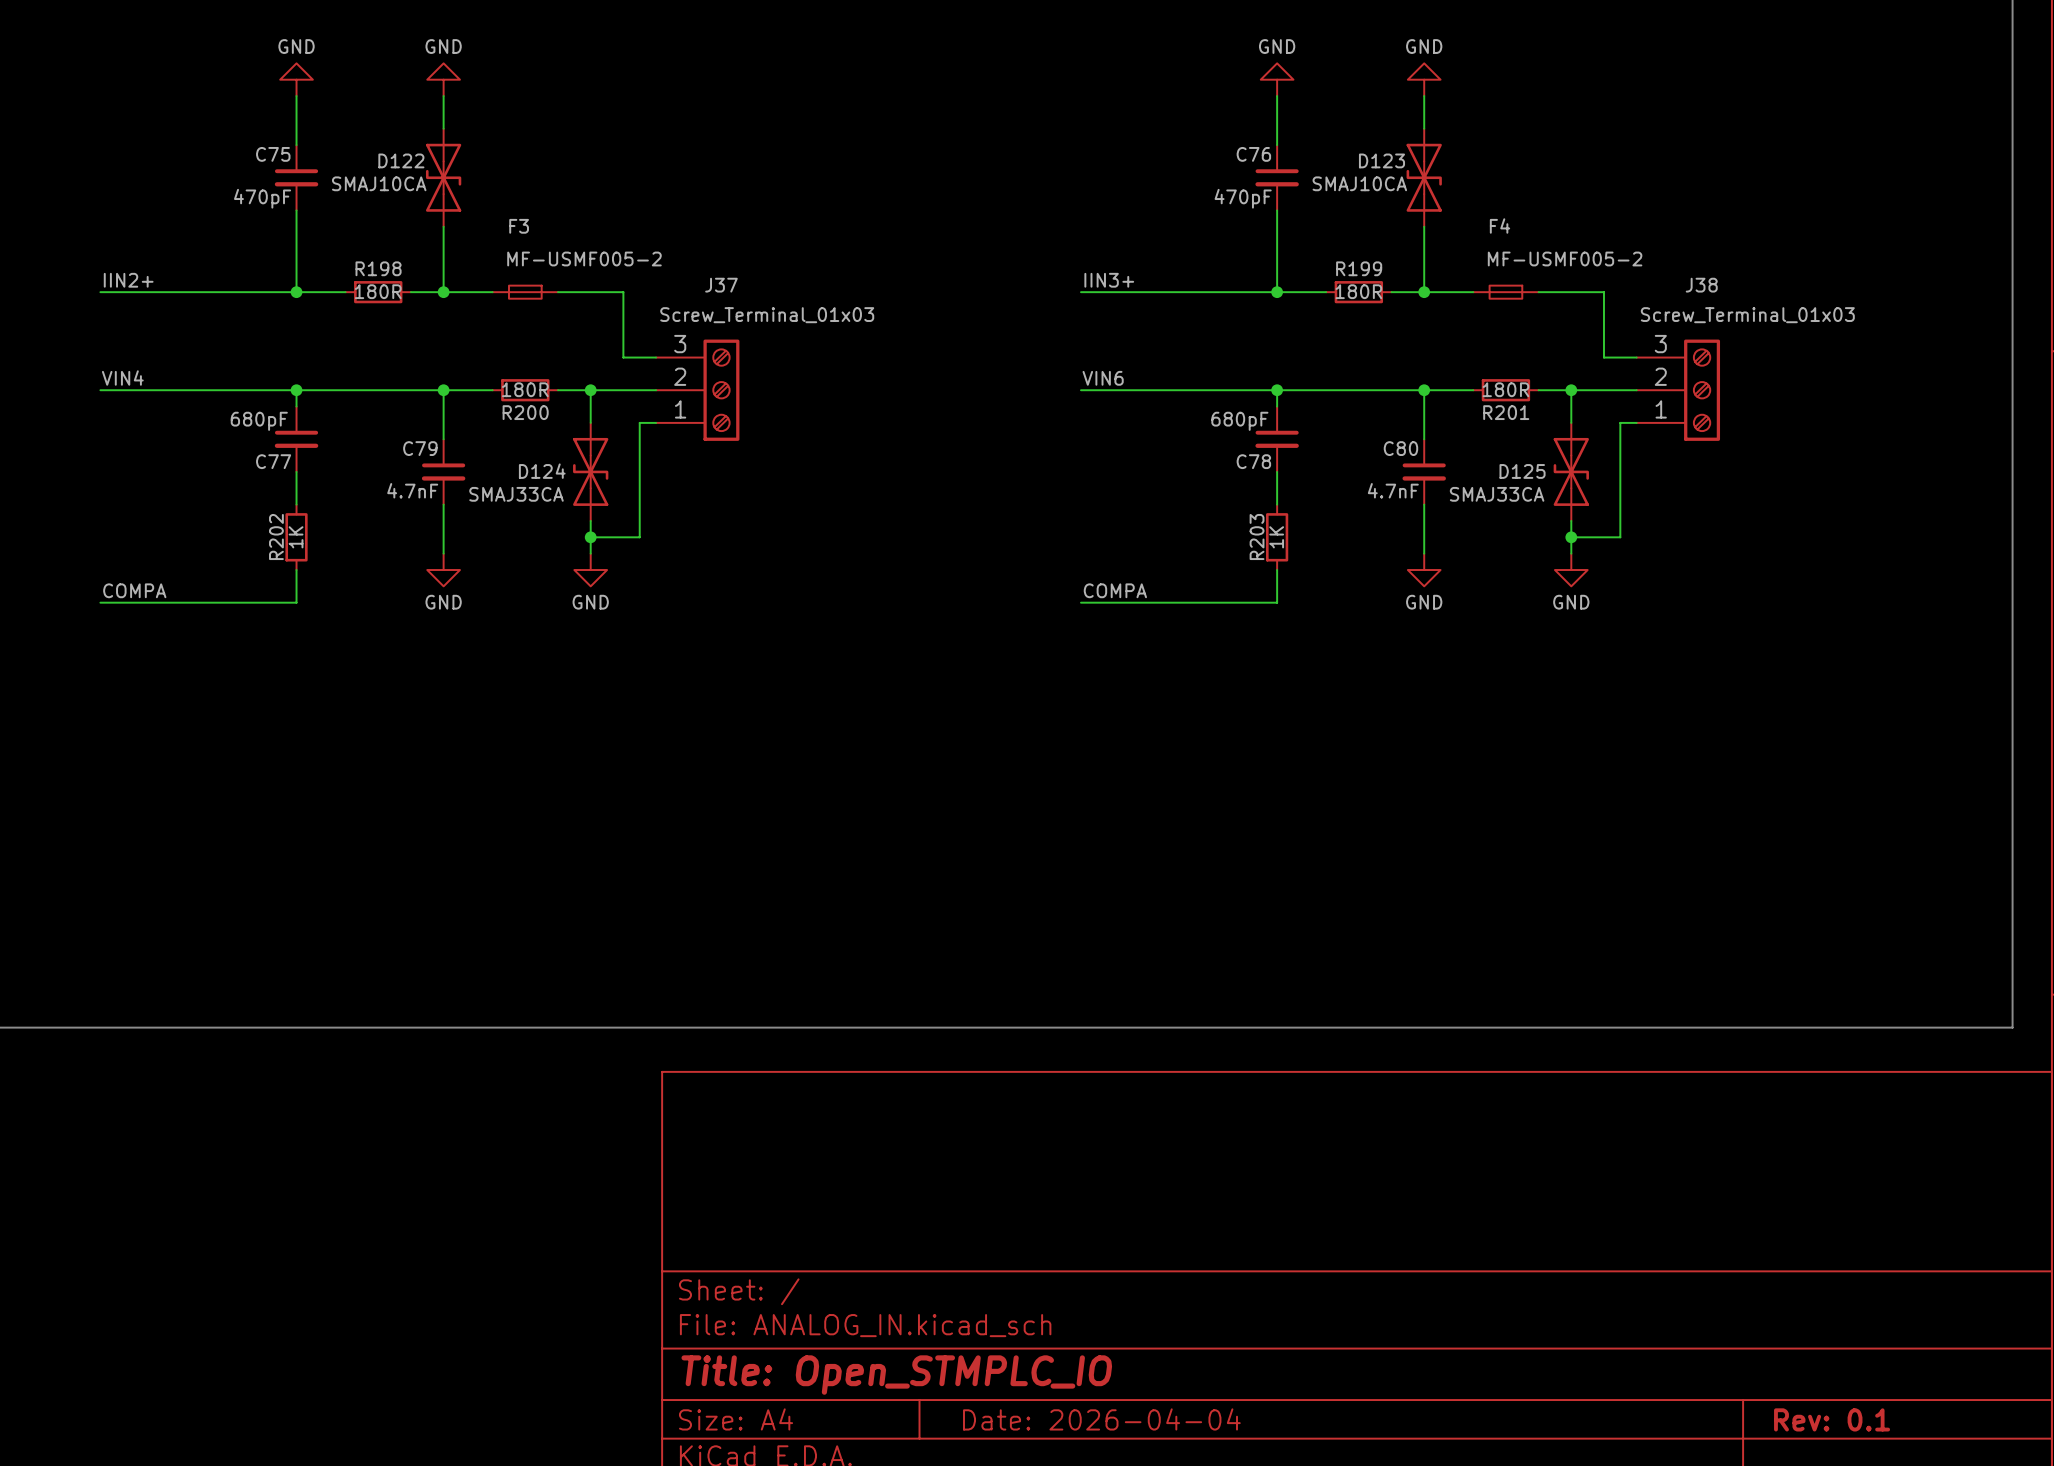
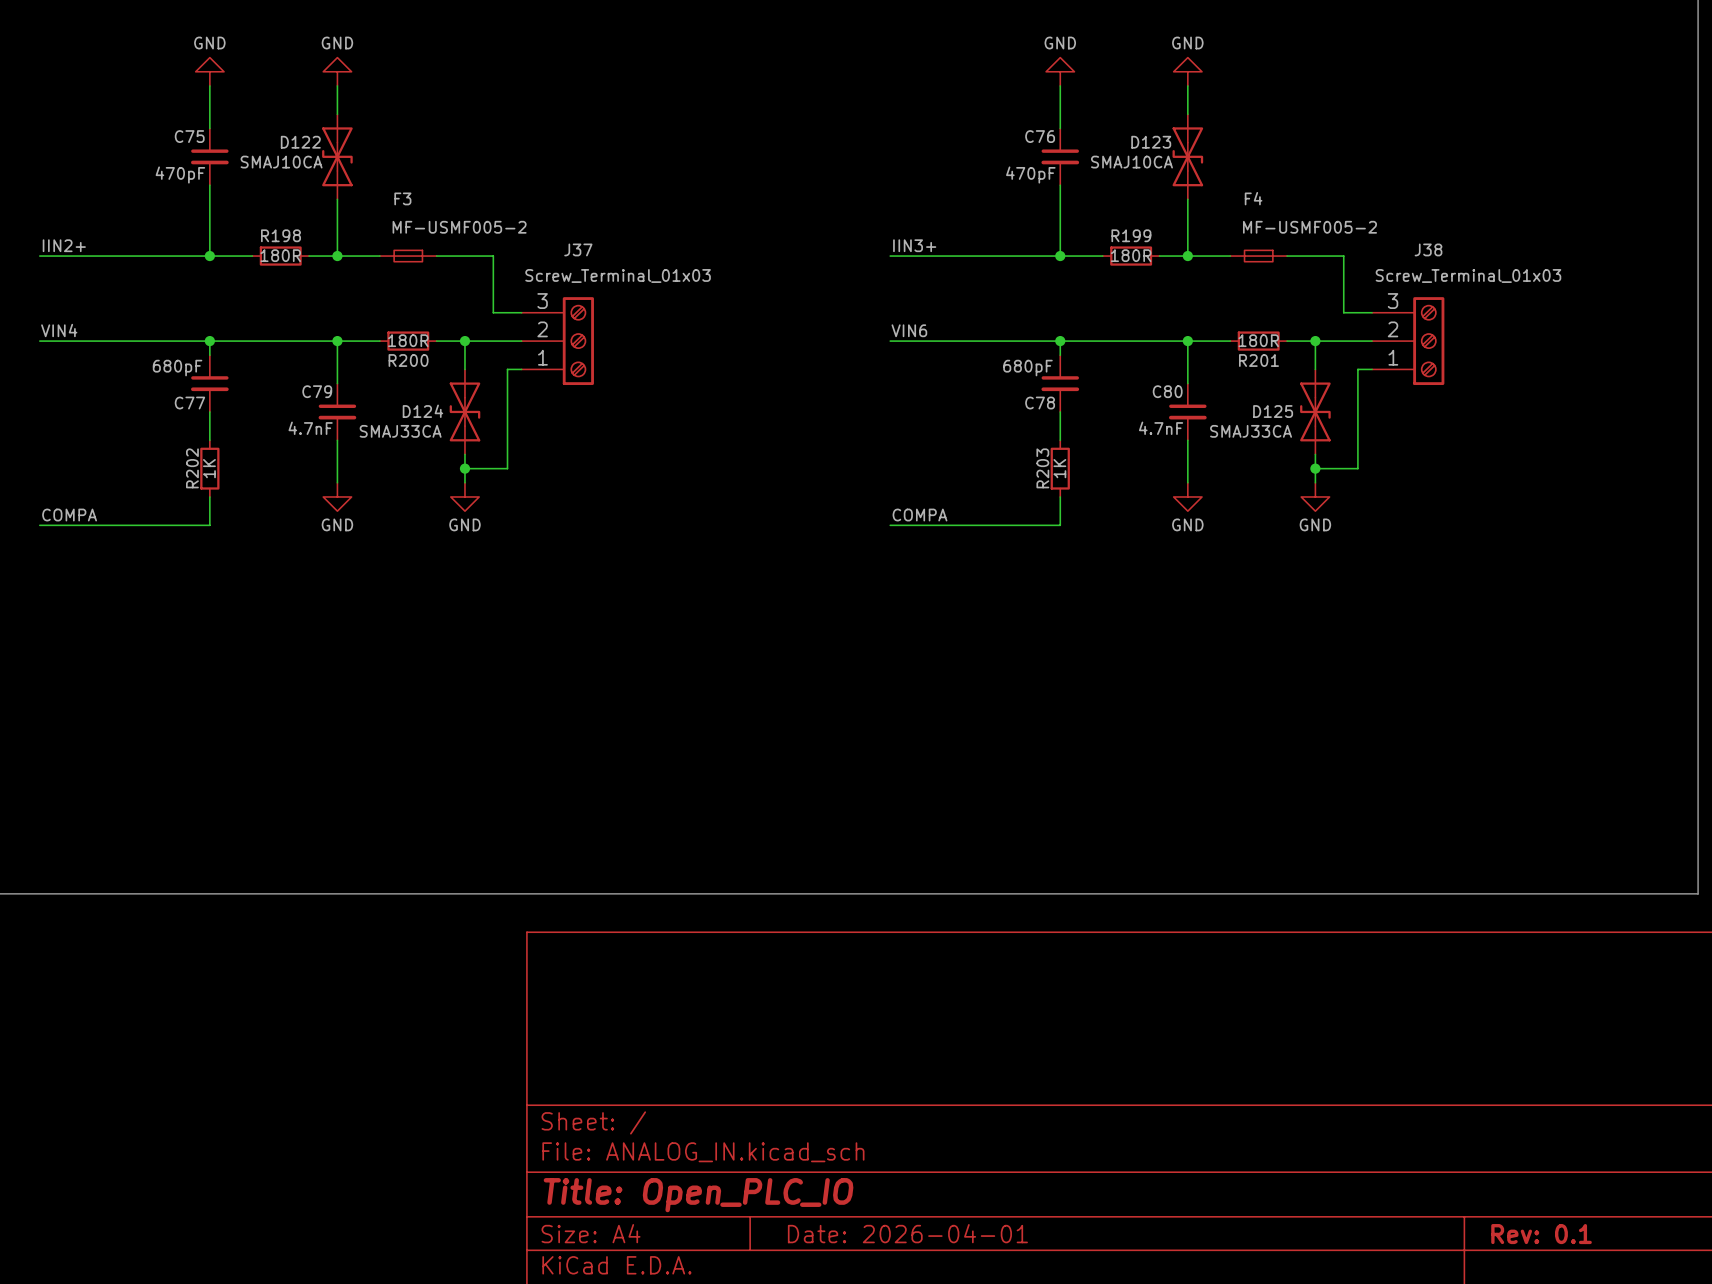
title block: Title: Open_STMPLC_IO (896, 1375) -> Title: Open_PLC_IO (698, 1195)
title block: Date: 2026-04-04 (1101, 1419) -> Date: 2026-04-01 (907, 1233)

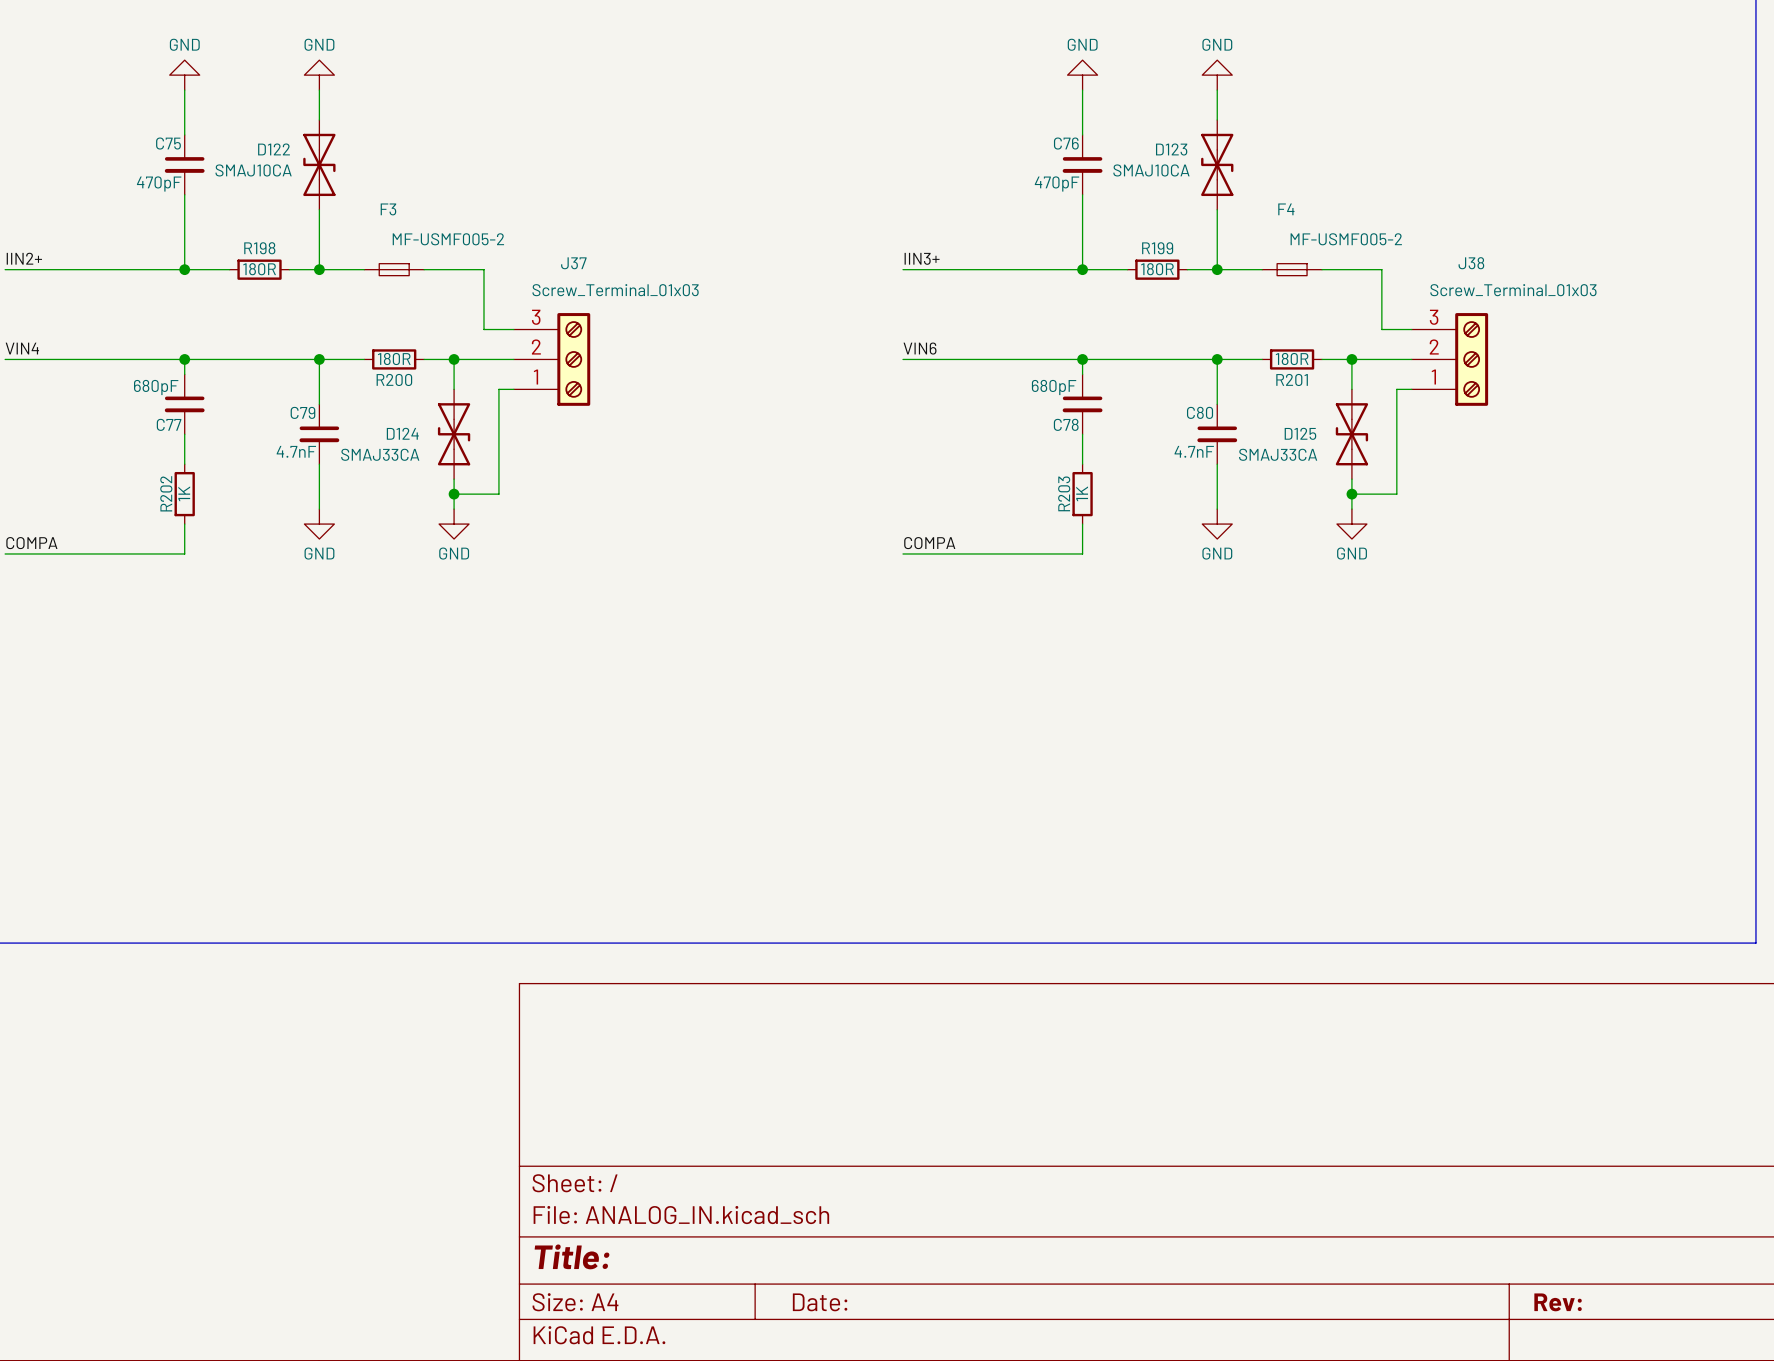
title block: Title: Open_PLC_IO (698, 1195) -> Title: (572, 1256)
title block: Date: 2026-04-01 (907, 1233) -> Date: (820, 1302)
title block: Rev: 0.1 (1541, 1234) -> Rev: (1558, 1302)

